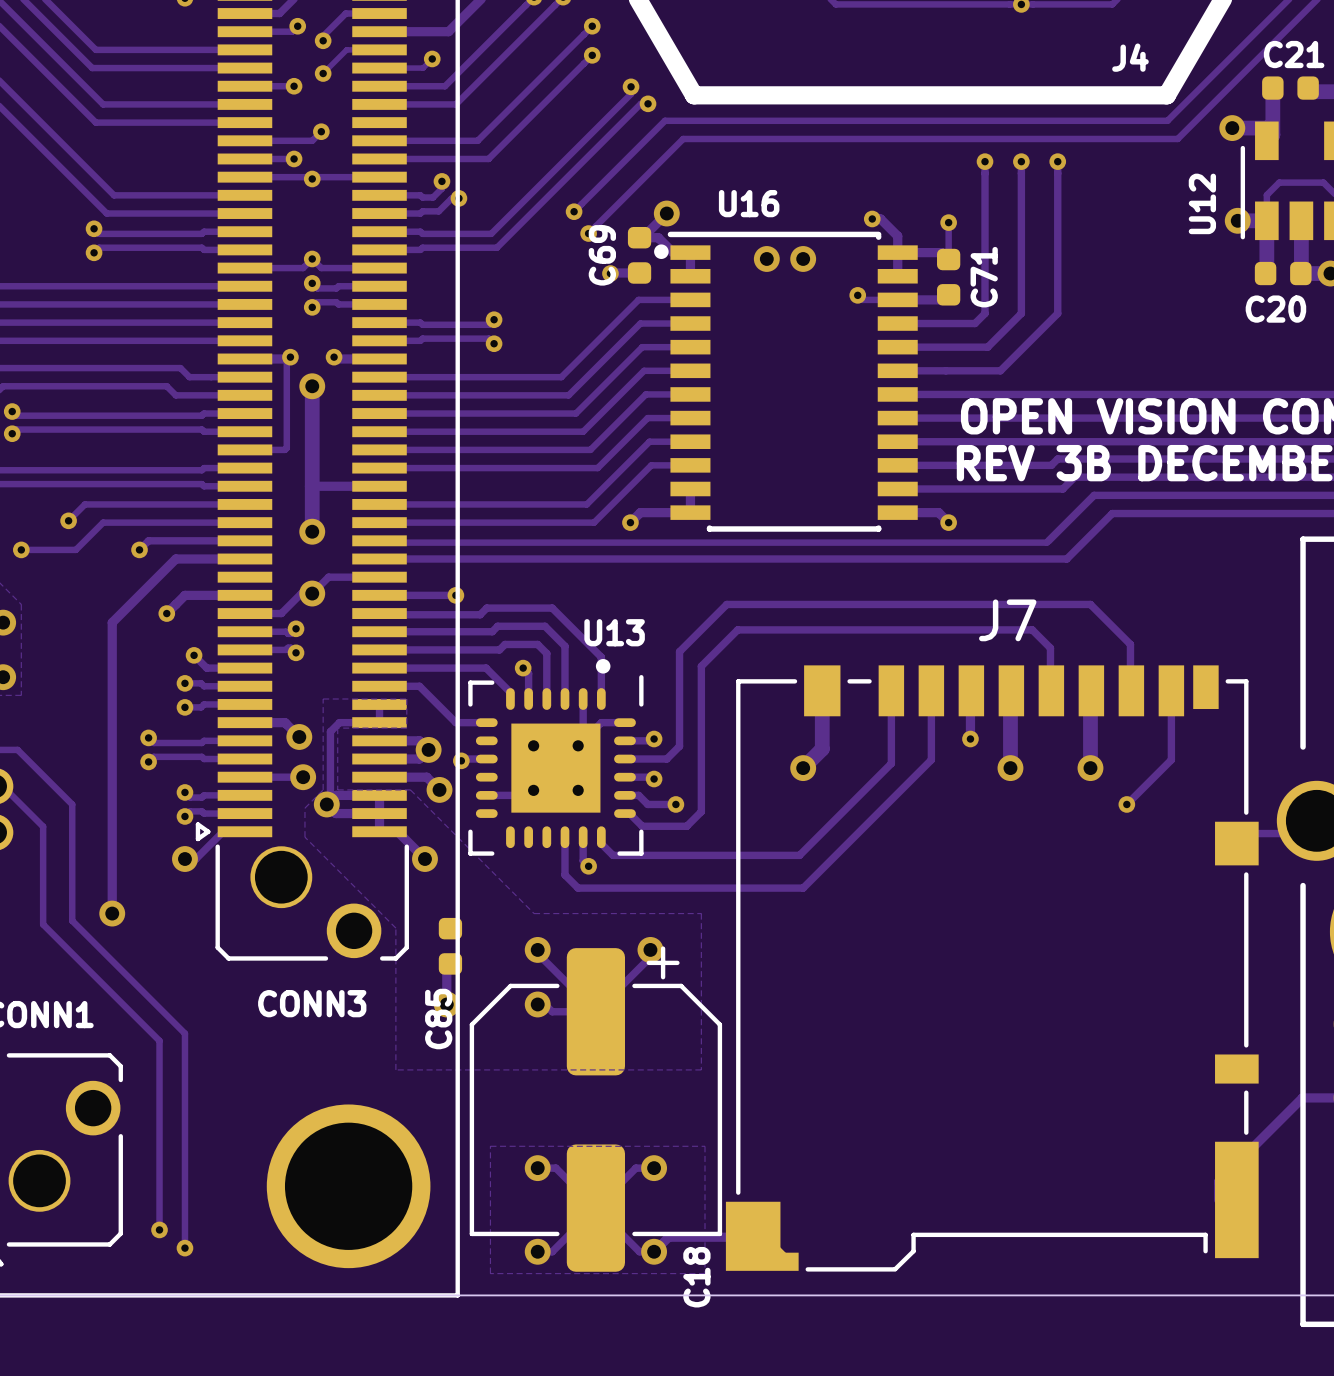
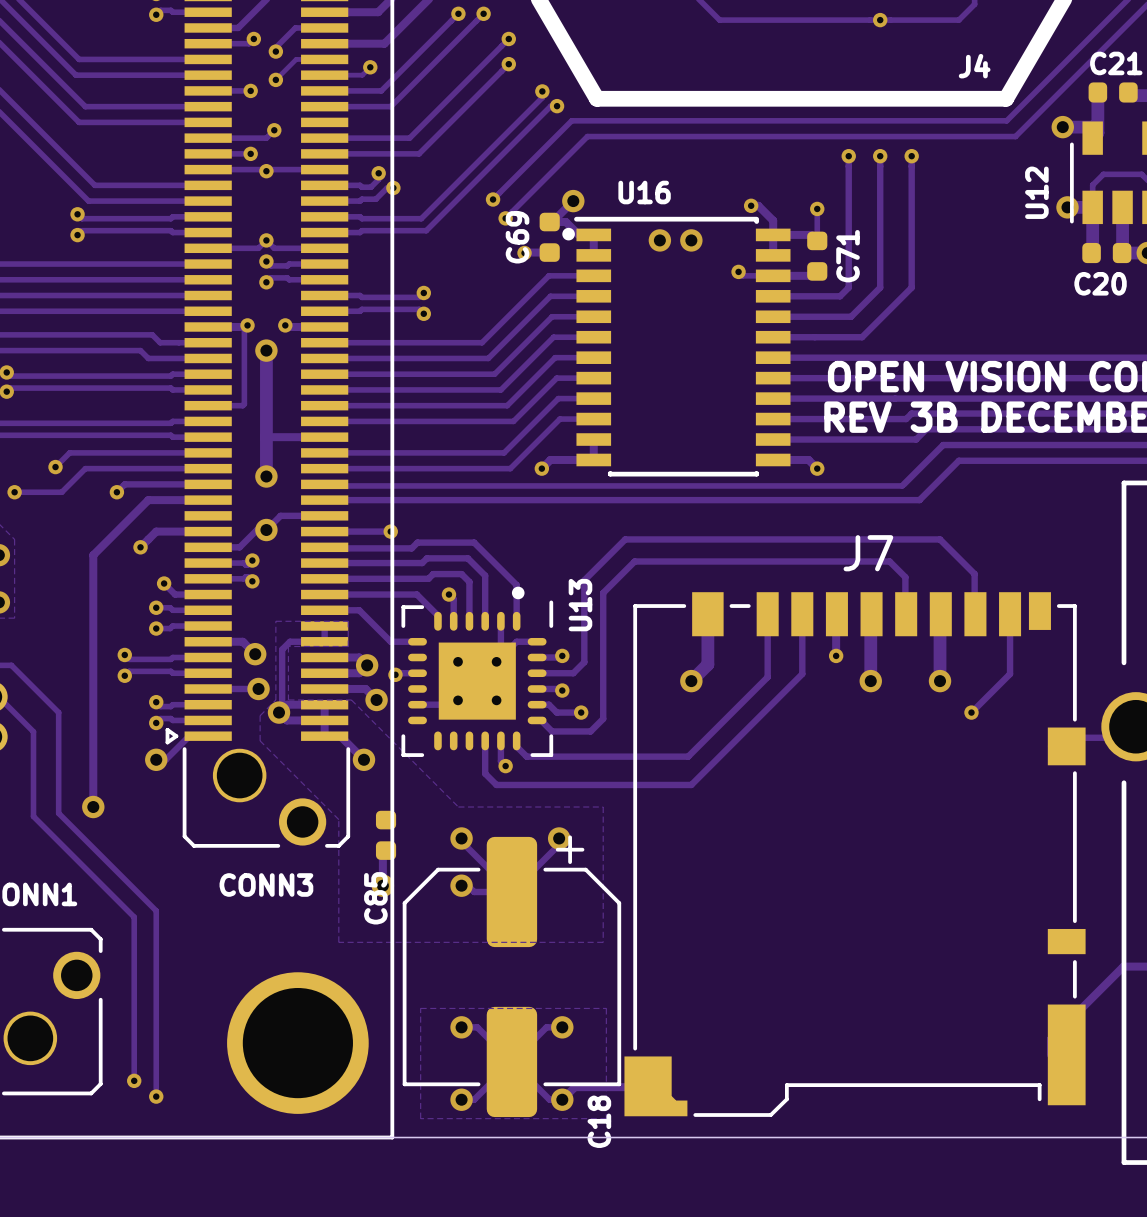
U13 name rotation: 0° (614, 632) -> 90° counterclockwise (580, 605)
U13 name position: U13 (614, 632) -> U13 (580, 605)

